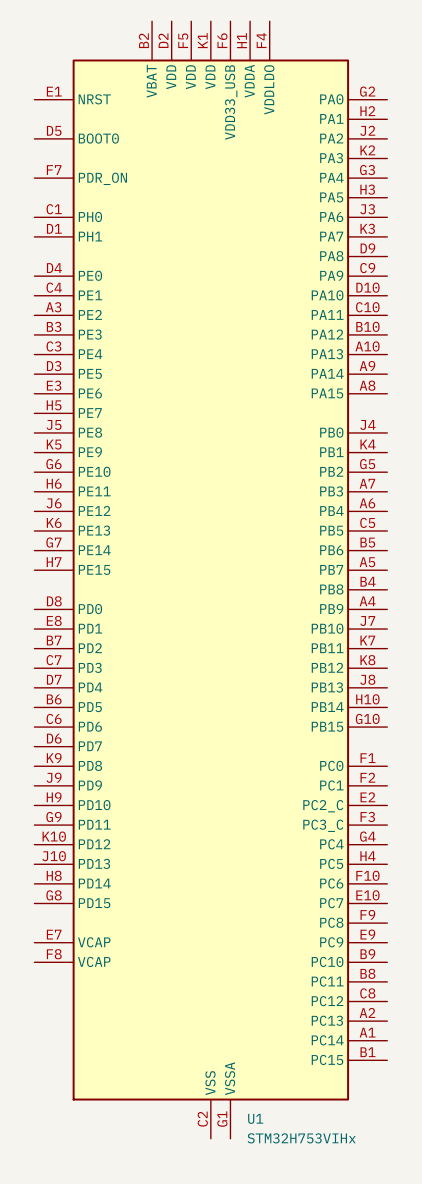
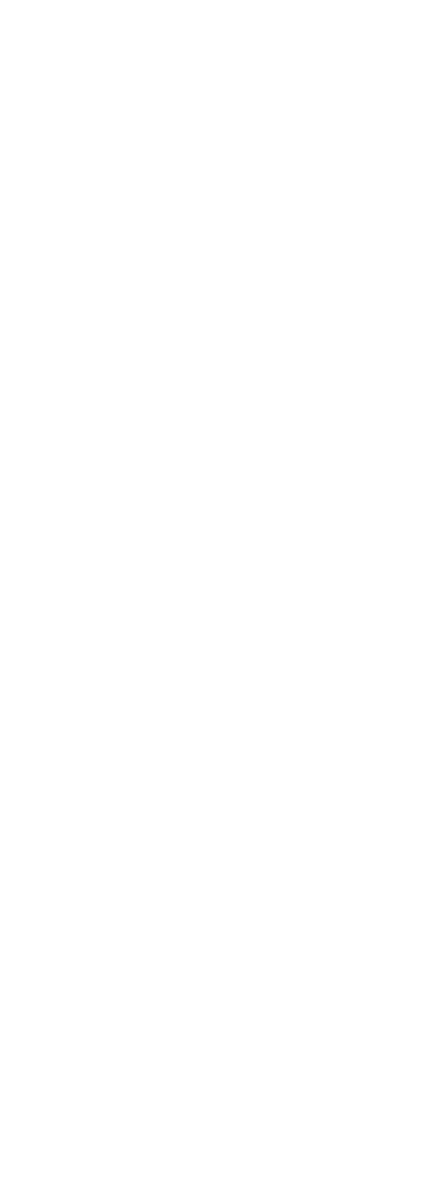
U1: STM32H753VIHx (210, 580) -> none

